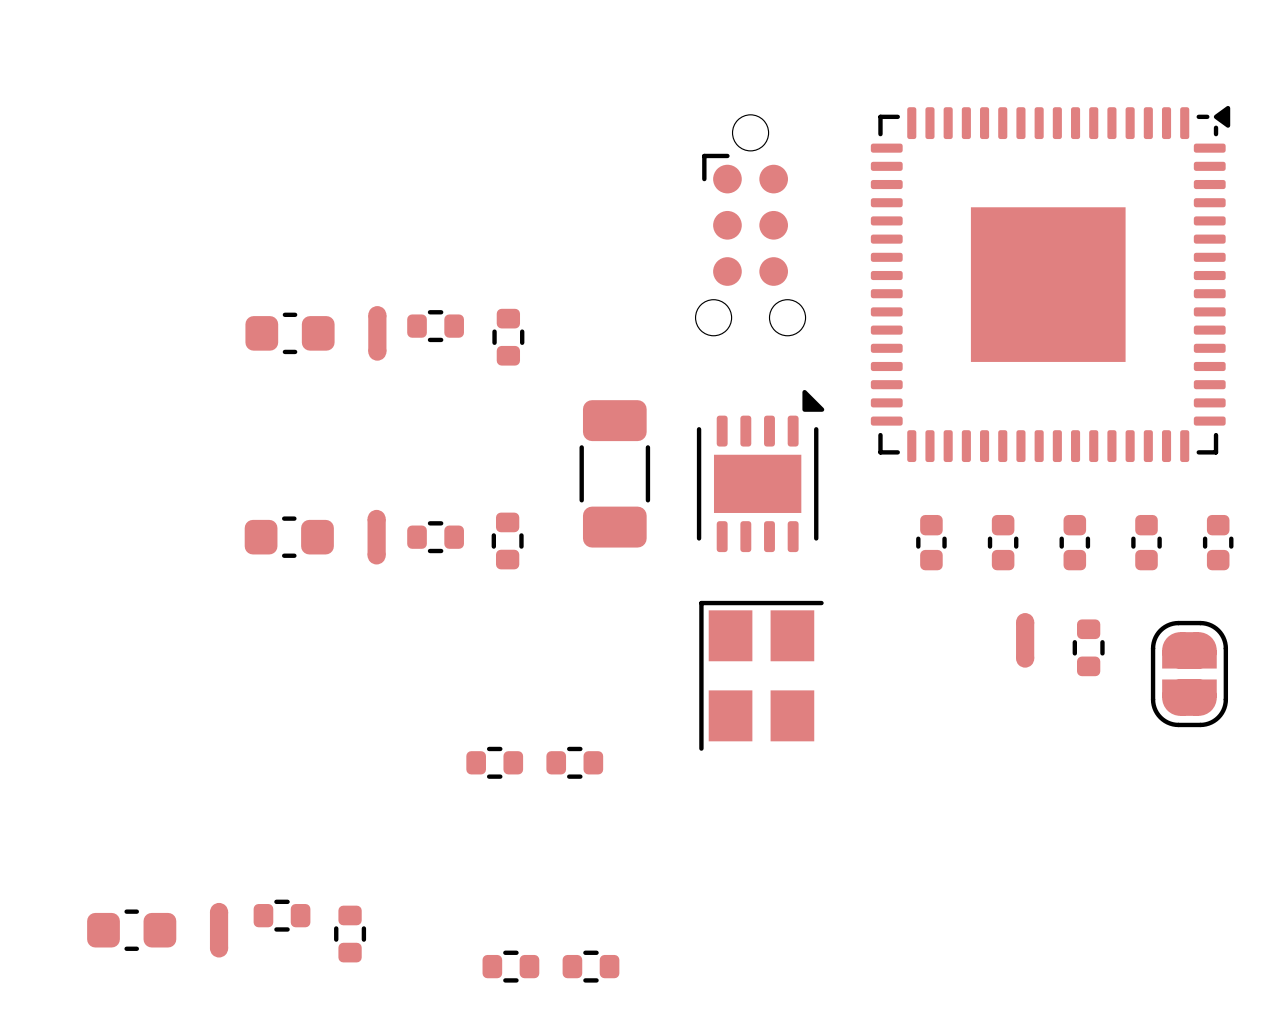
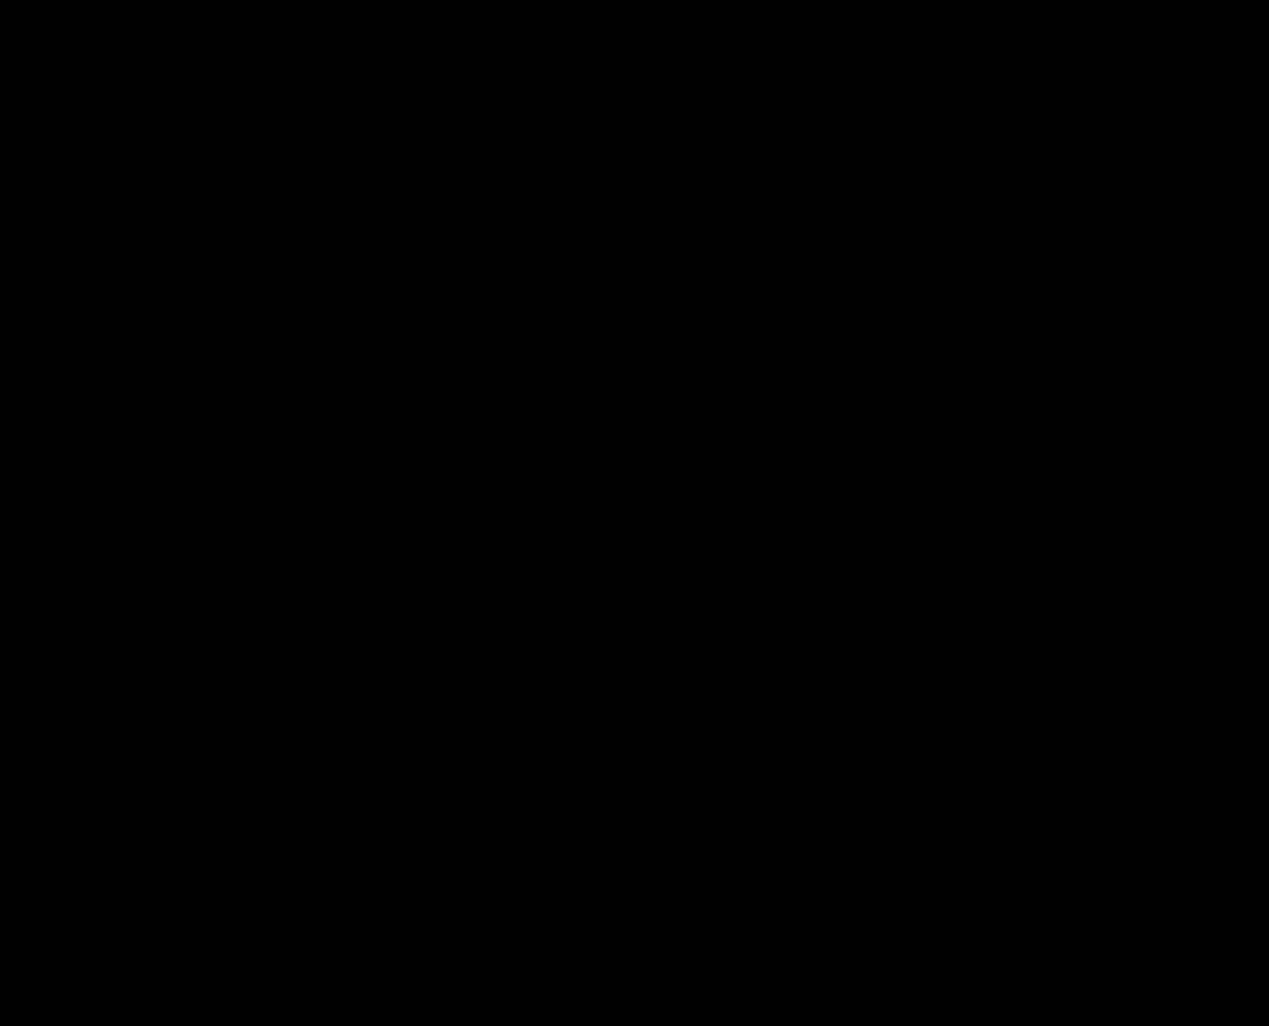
part: (750, 225) -> none
part: (1050, 283) -> none
part: (435, 326) -> none
part: (290, 333) -> none
part: (377, 333) -> none
part: (508, 337) -> none
part: (760, 471) -> none
part: (614, 473) -> none
part: (289, 537) -> none
part: (376, 537) -> none
part: (435, 537) -> none
part: (507, 540) -> none
part: (931, 542) -> none
part: (1003, 542) -> none
part: (1074, 542) -> none
part: (1146, 542) -> none
part: (1218, 542) -> none
part: (1025, 640) -> none
part: (1088, 647) -> none
part: (1189, 674) -> none
part: (761, 675) -> none
part: (494, 762) -> none
part: (574, 762) -> none
part: (282, 915) -> none
part: (131, 930) -> none
part: (219, 930) -> none
part: (350, 934) -> none
part: (510, 966) -> none
part: (590, 966) -> none

